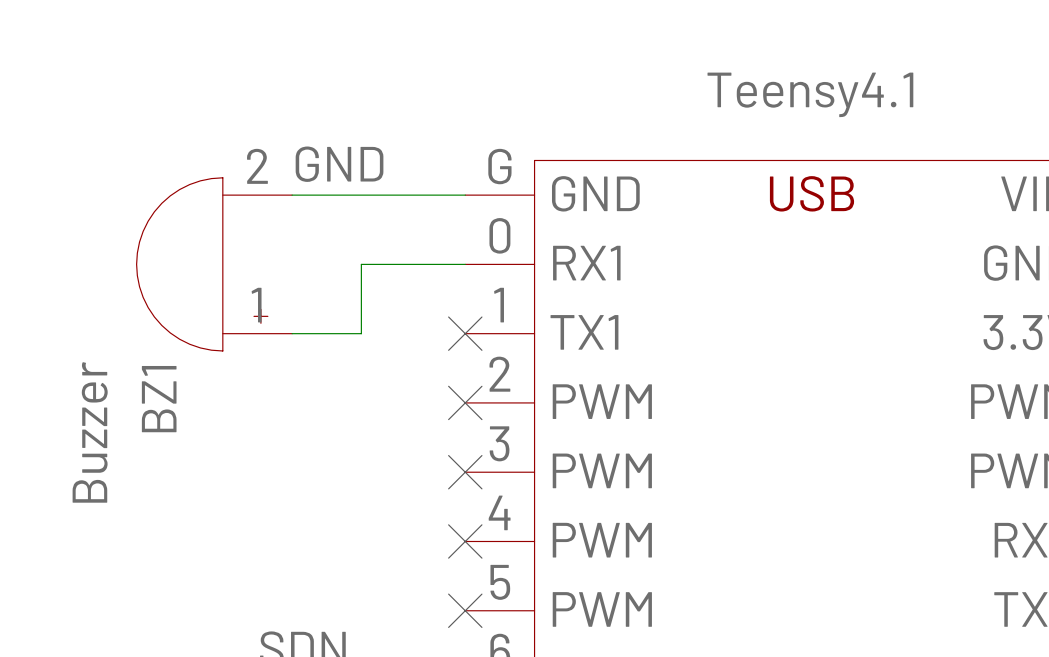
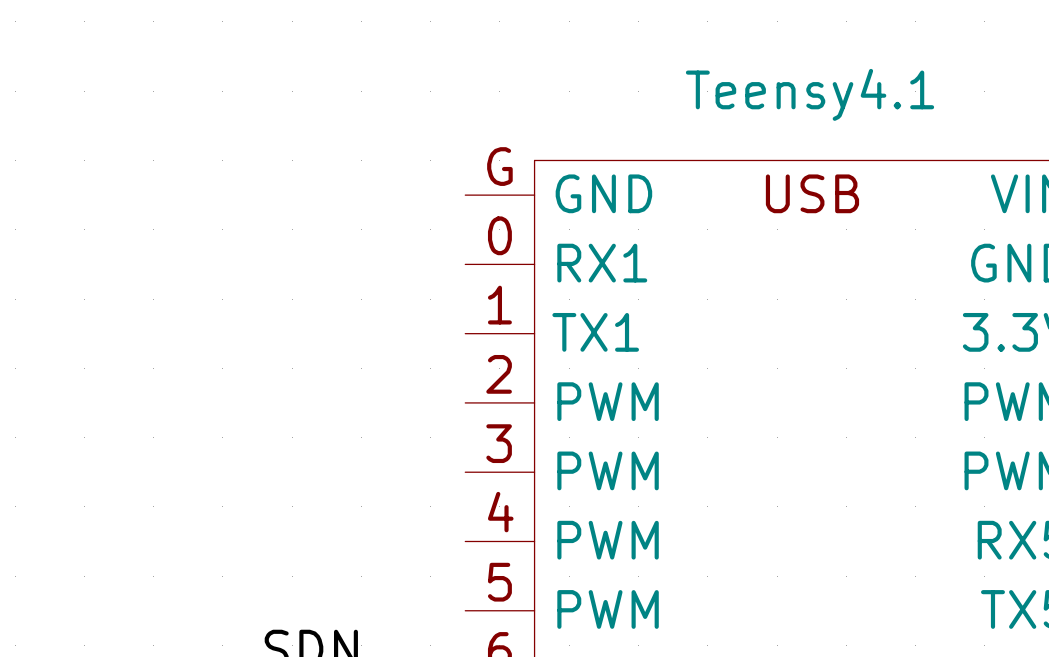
label: GND (339, 164) -> none
wire: (292, 195) (465, 195) -> none
BZ1: Buzzer (214, 264) -> none
wire: (465, 264) (361, 264) (361, 333) (292, 333) -> none
no-connect mark: (465, 333) -> none
no-connect mark: (465, 402) -> none
no-connect mark: (465, 472) -> none
no-connect mark: (465, 541) -> none
no-connect mark: (465, 610) -> none

